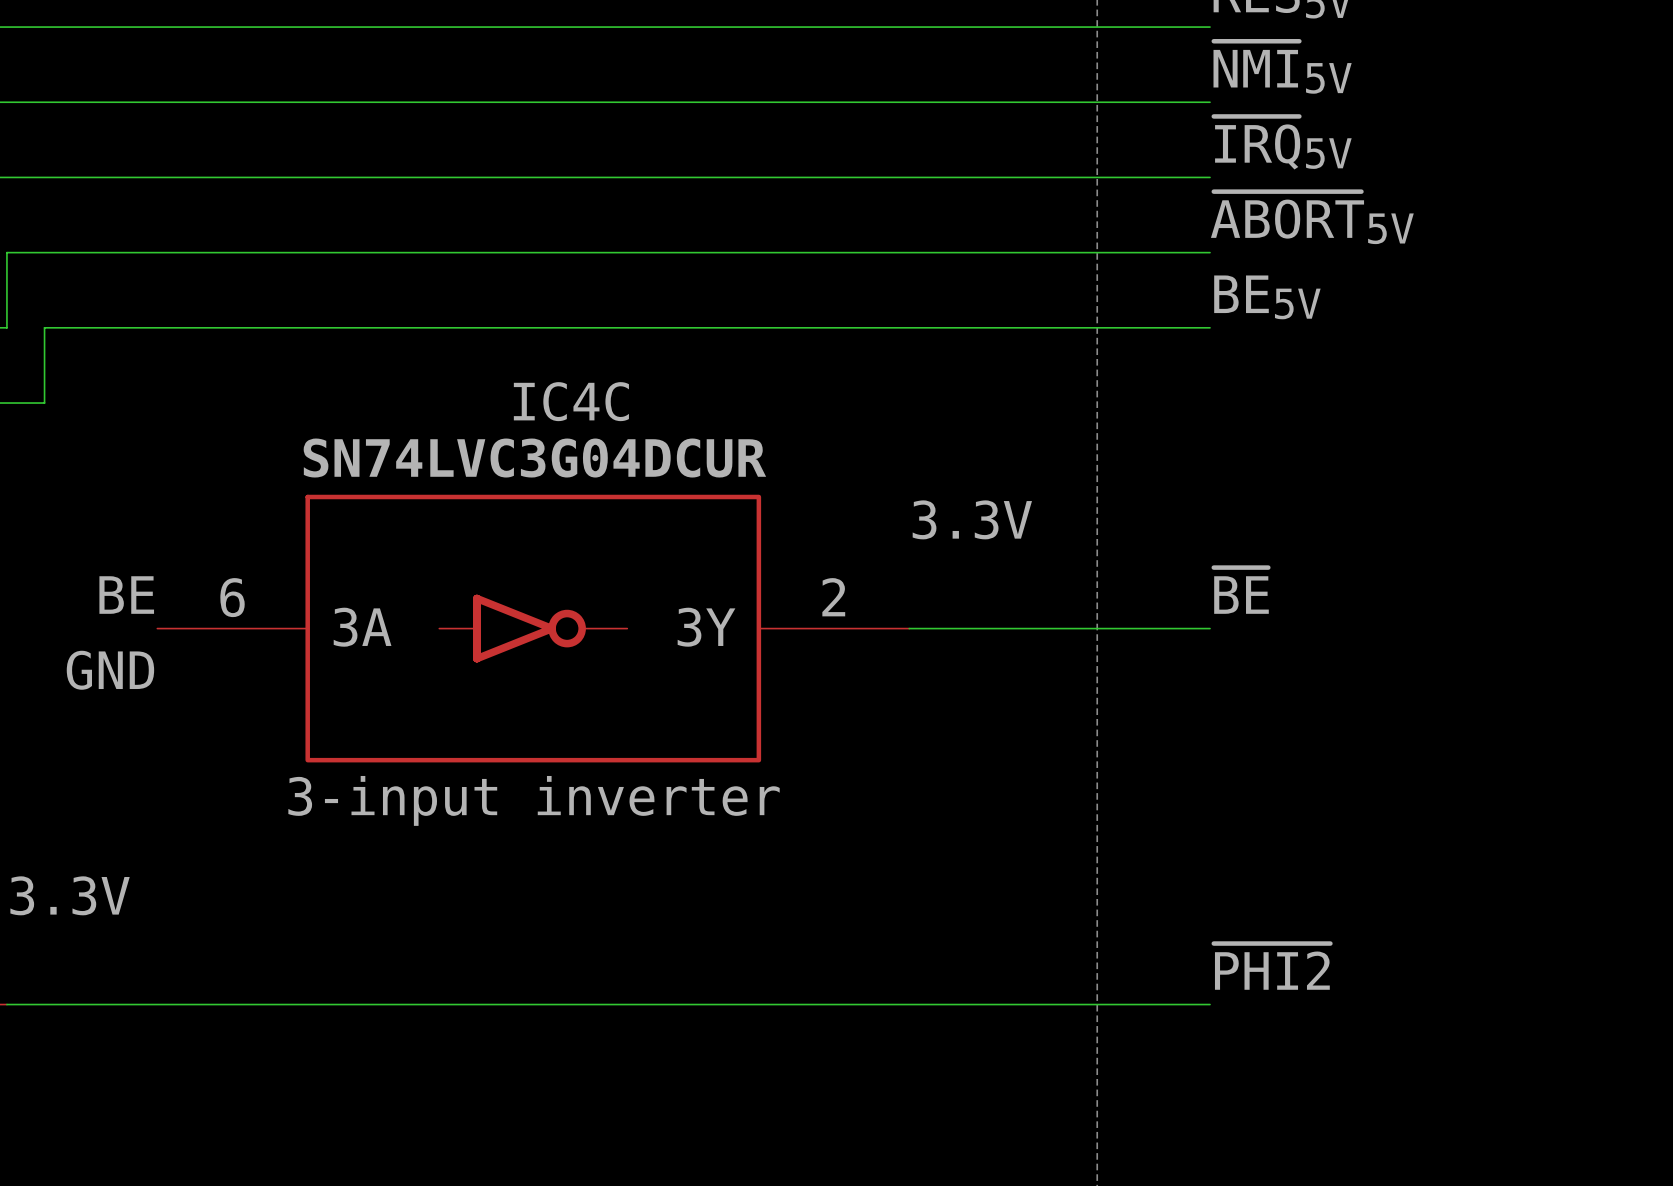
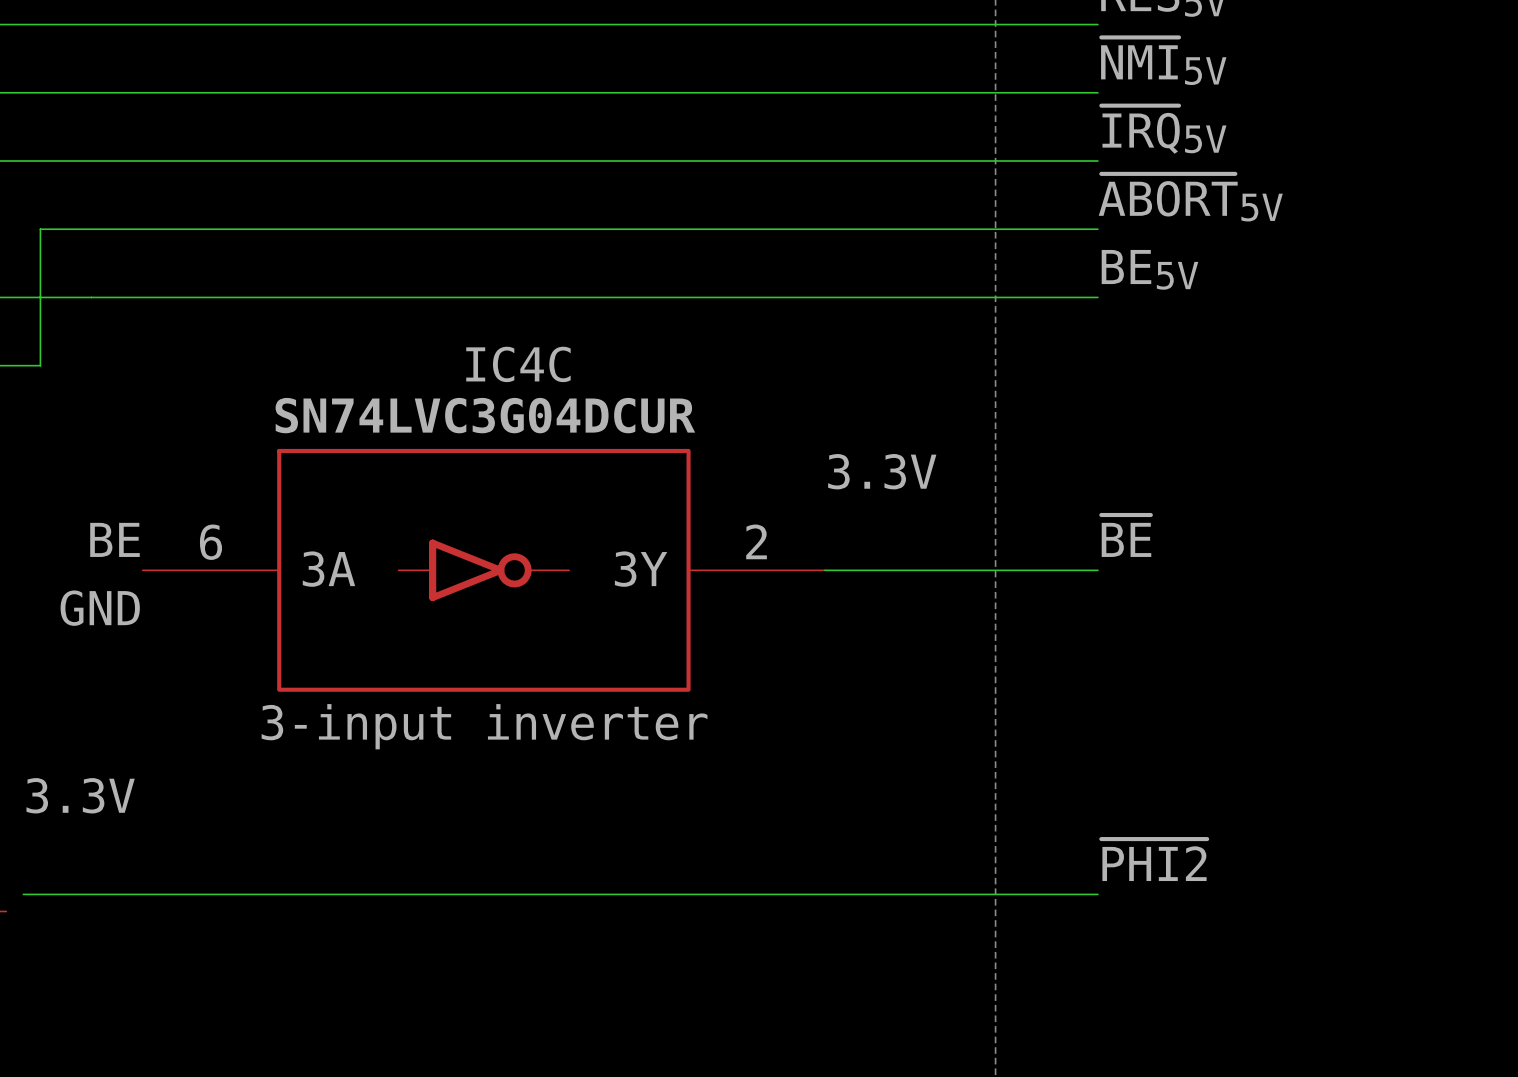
wire: (44, 252) (6, 252) (6, 327) -> (40, 229) (40, 297) (6, 297)
label position: 3.3V (70, 895) -> 3.3V (80, 795)
label position: ~{PHI2} (1272, 966) -> ~{PHI2} (1154, 860)
wire: none -> (23, 894) (1097, 894)
wire: (6, 1004) (1210, 1004) -> none

